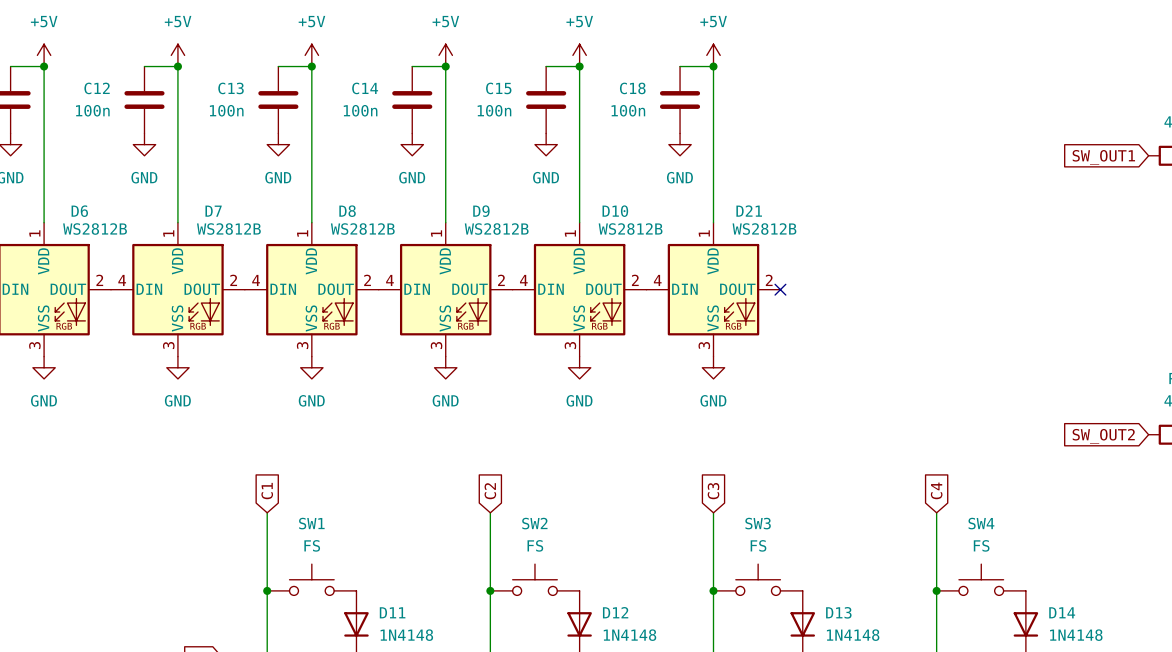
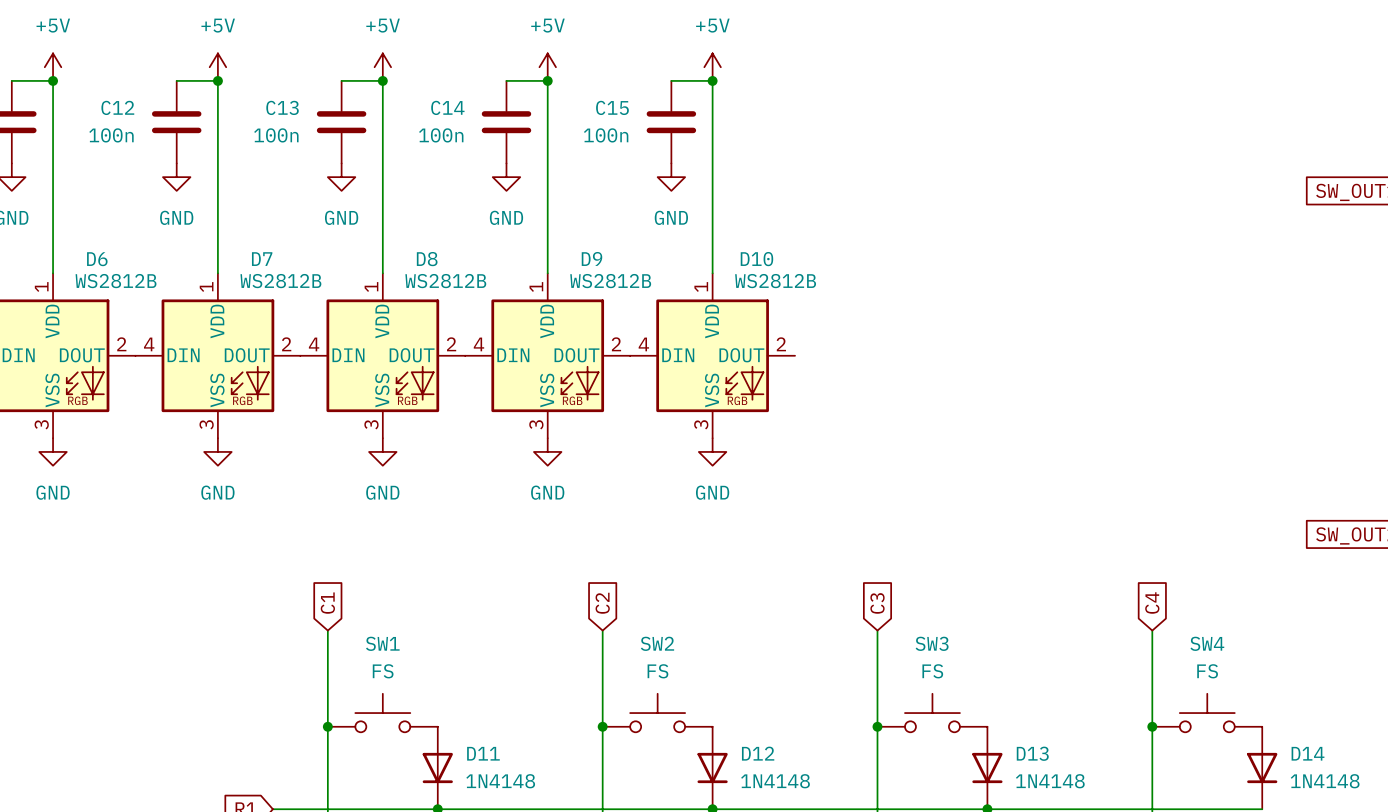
power symbol: +5V (713, 55) -> none
wire: (680, 66) (713, 66) (713, 222) -> none
junction: (713, 66) -> none
C18: 100n (680, 100) -> none
power symbol: GND (680, 144) -> none
D21: WS2812B (713, 289) -> none
no-connect mark: (780, 289) -> none
power symbol: GND (713, 367) -> none

